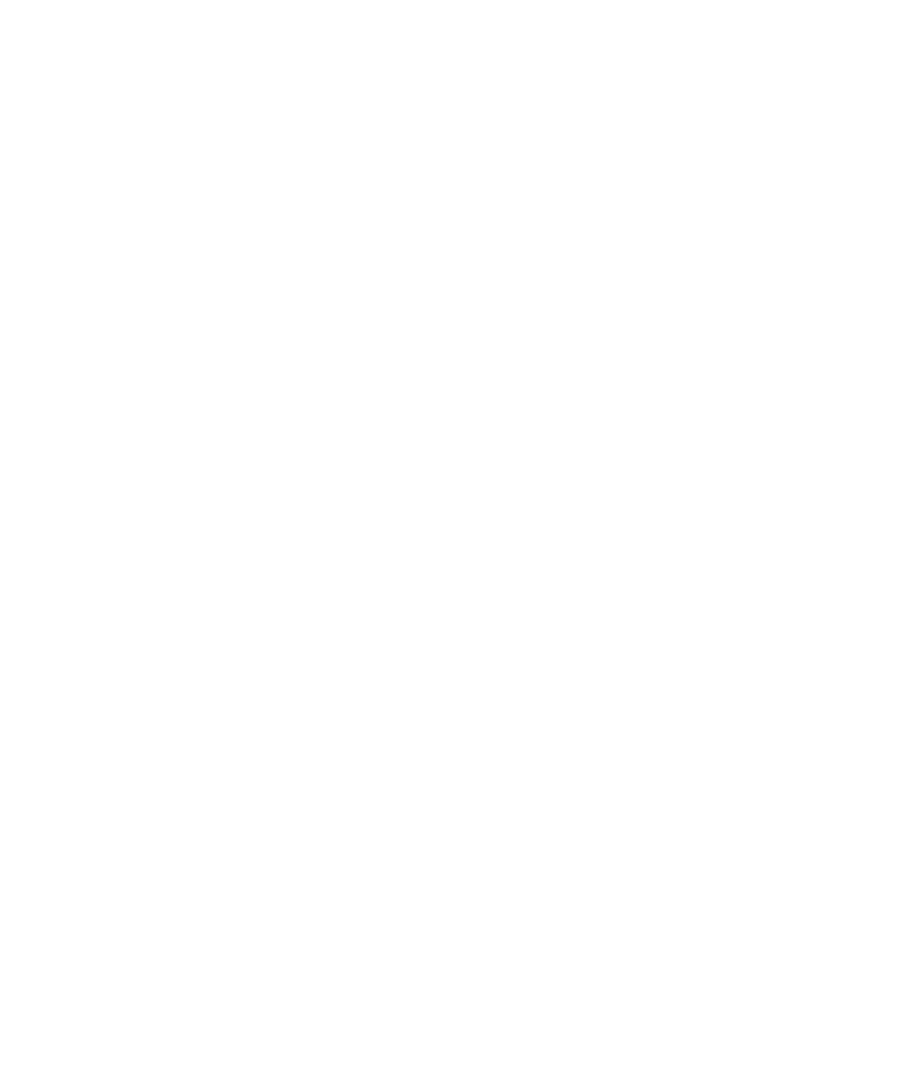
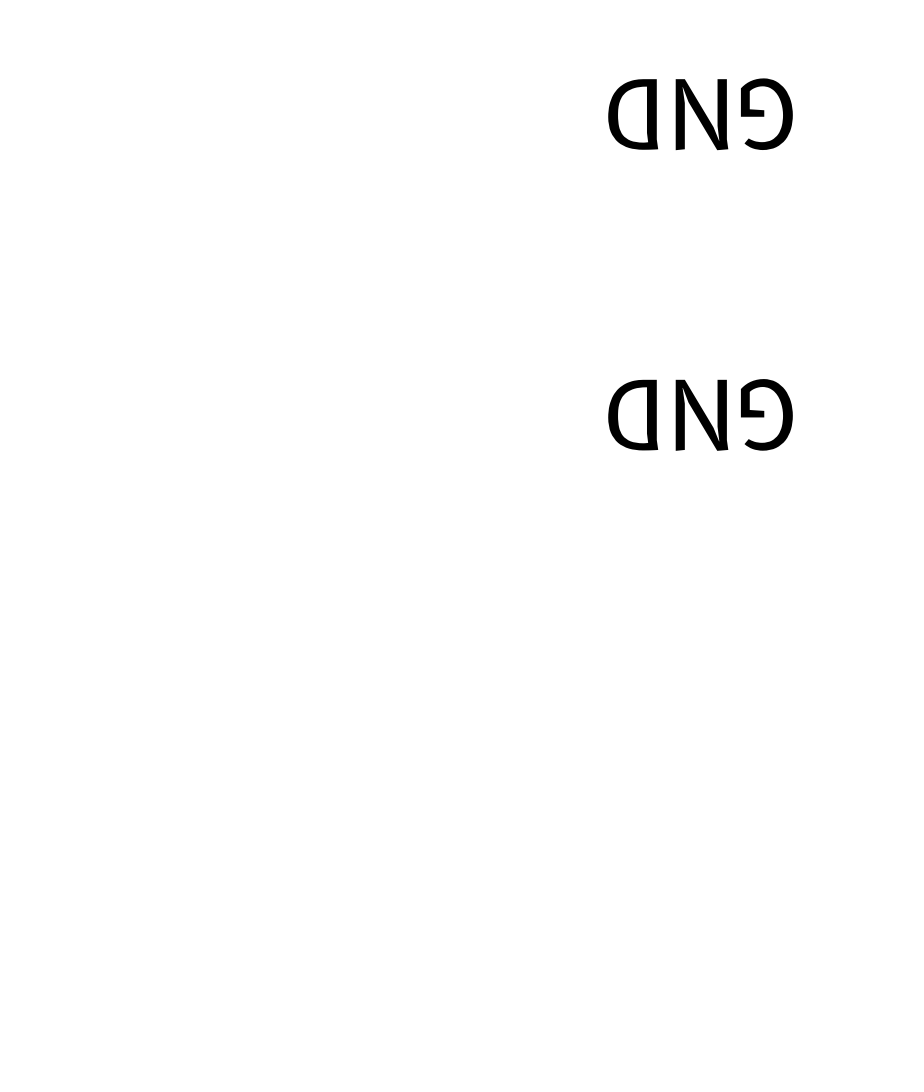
text: none -> GND (700, 114)
text: none -> GND (700, 414)

